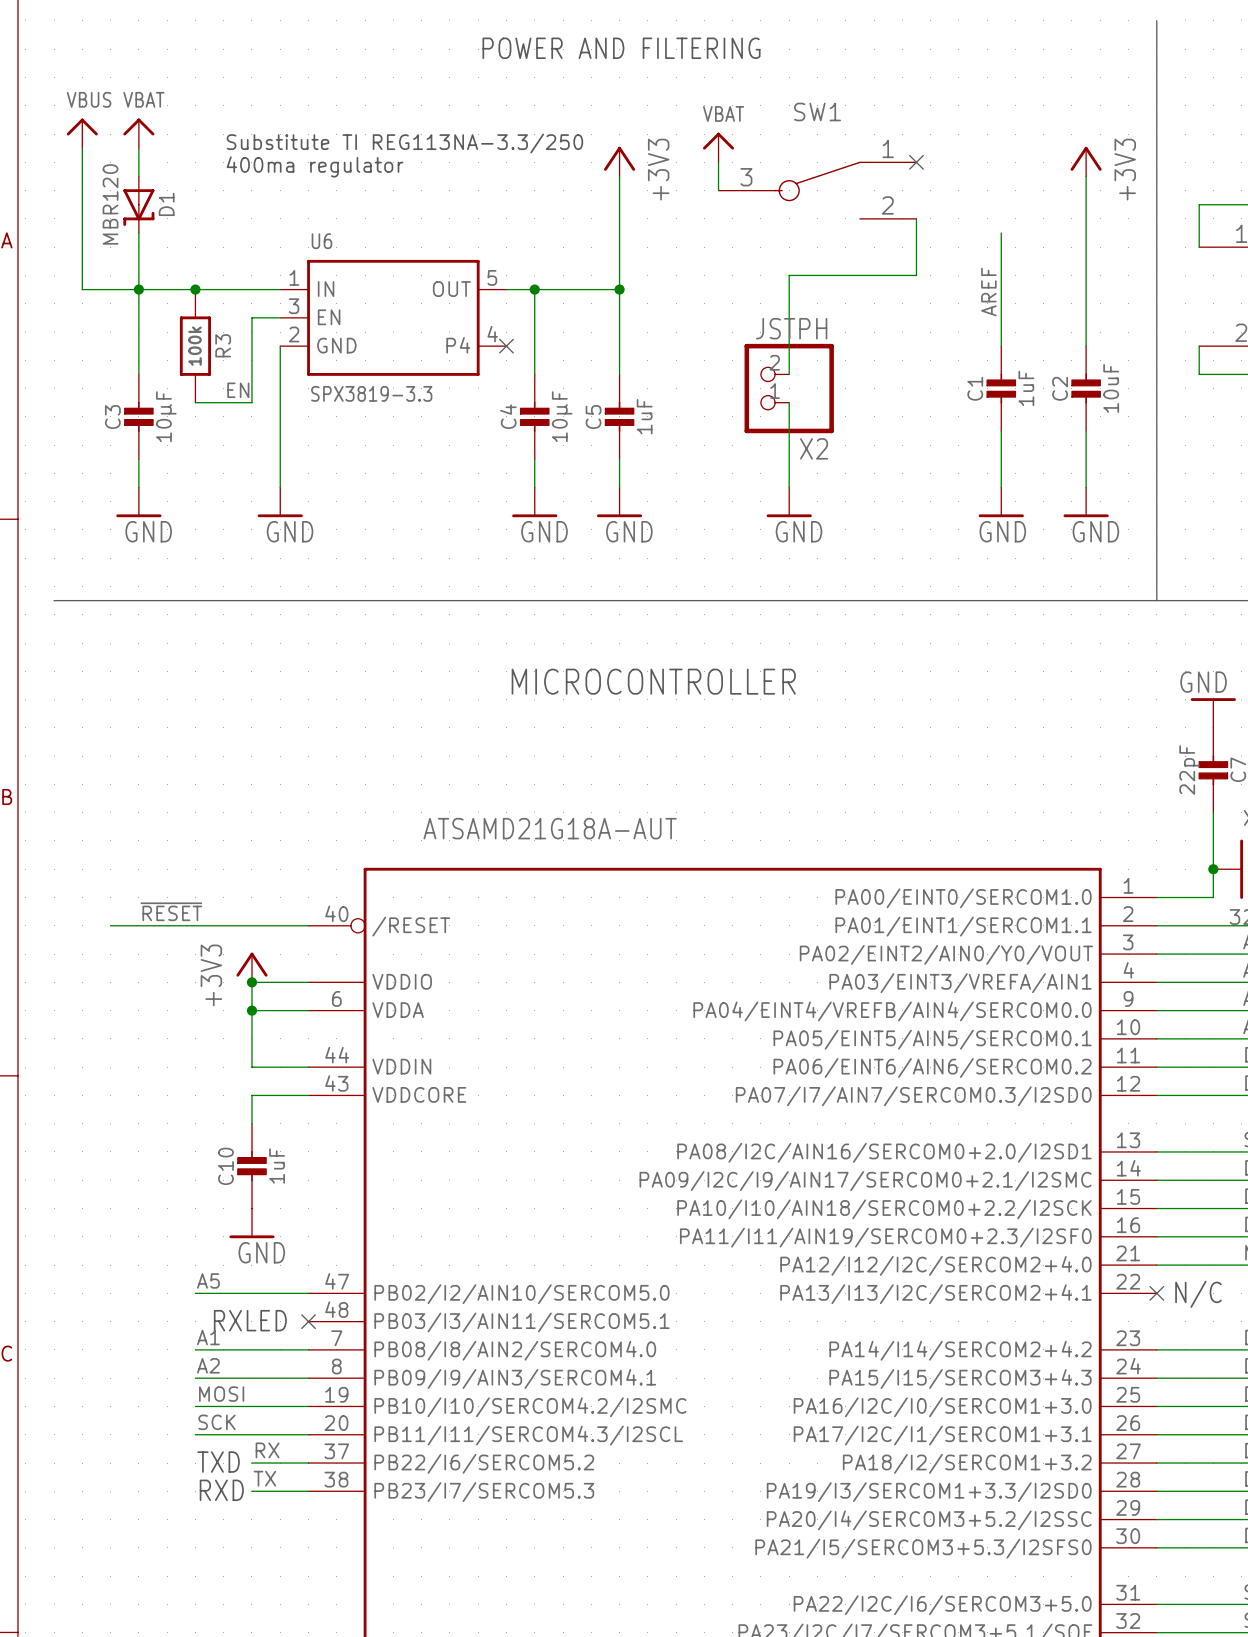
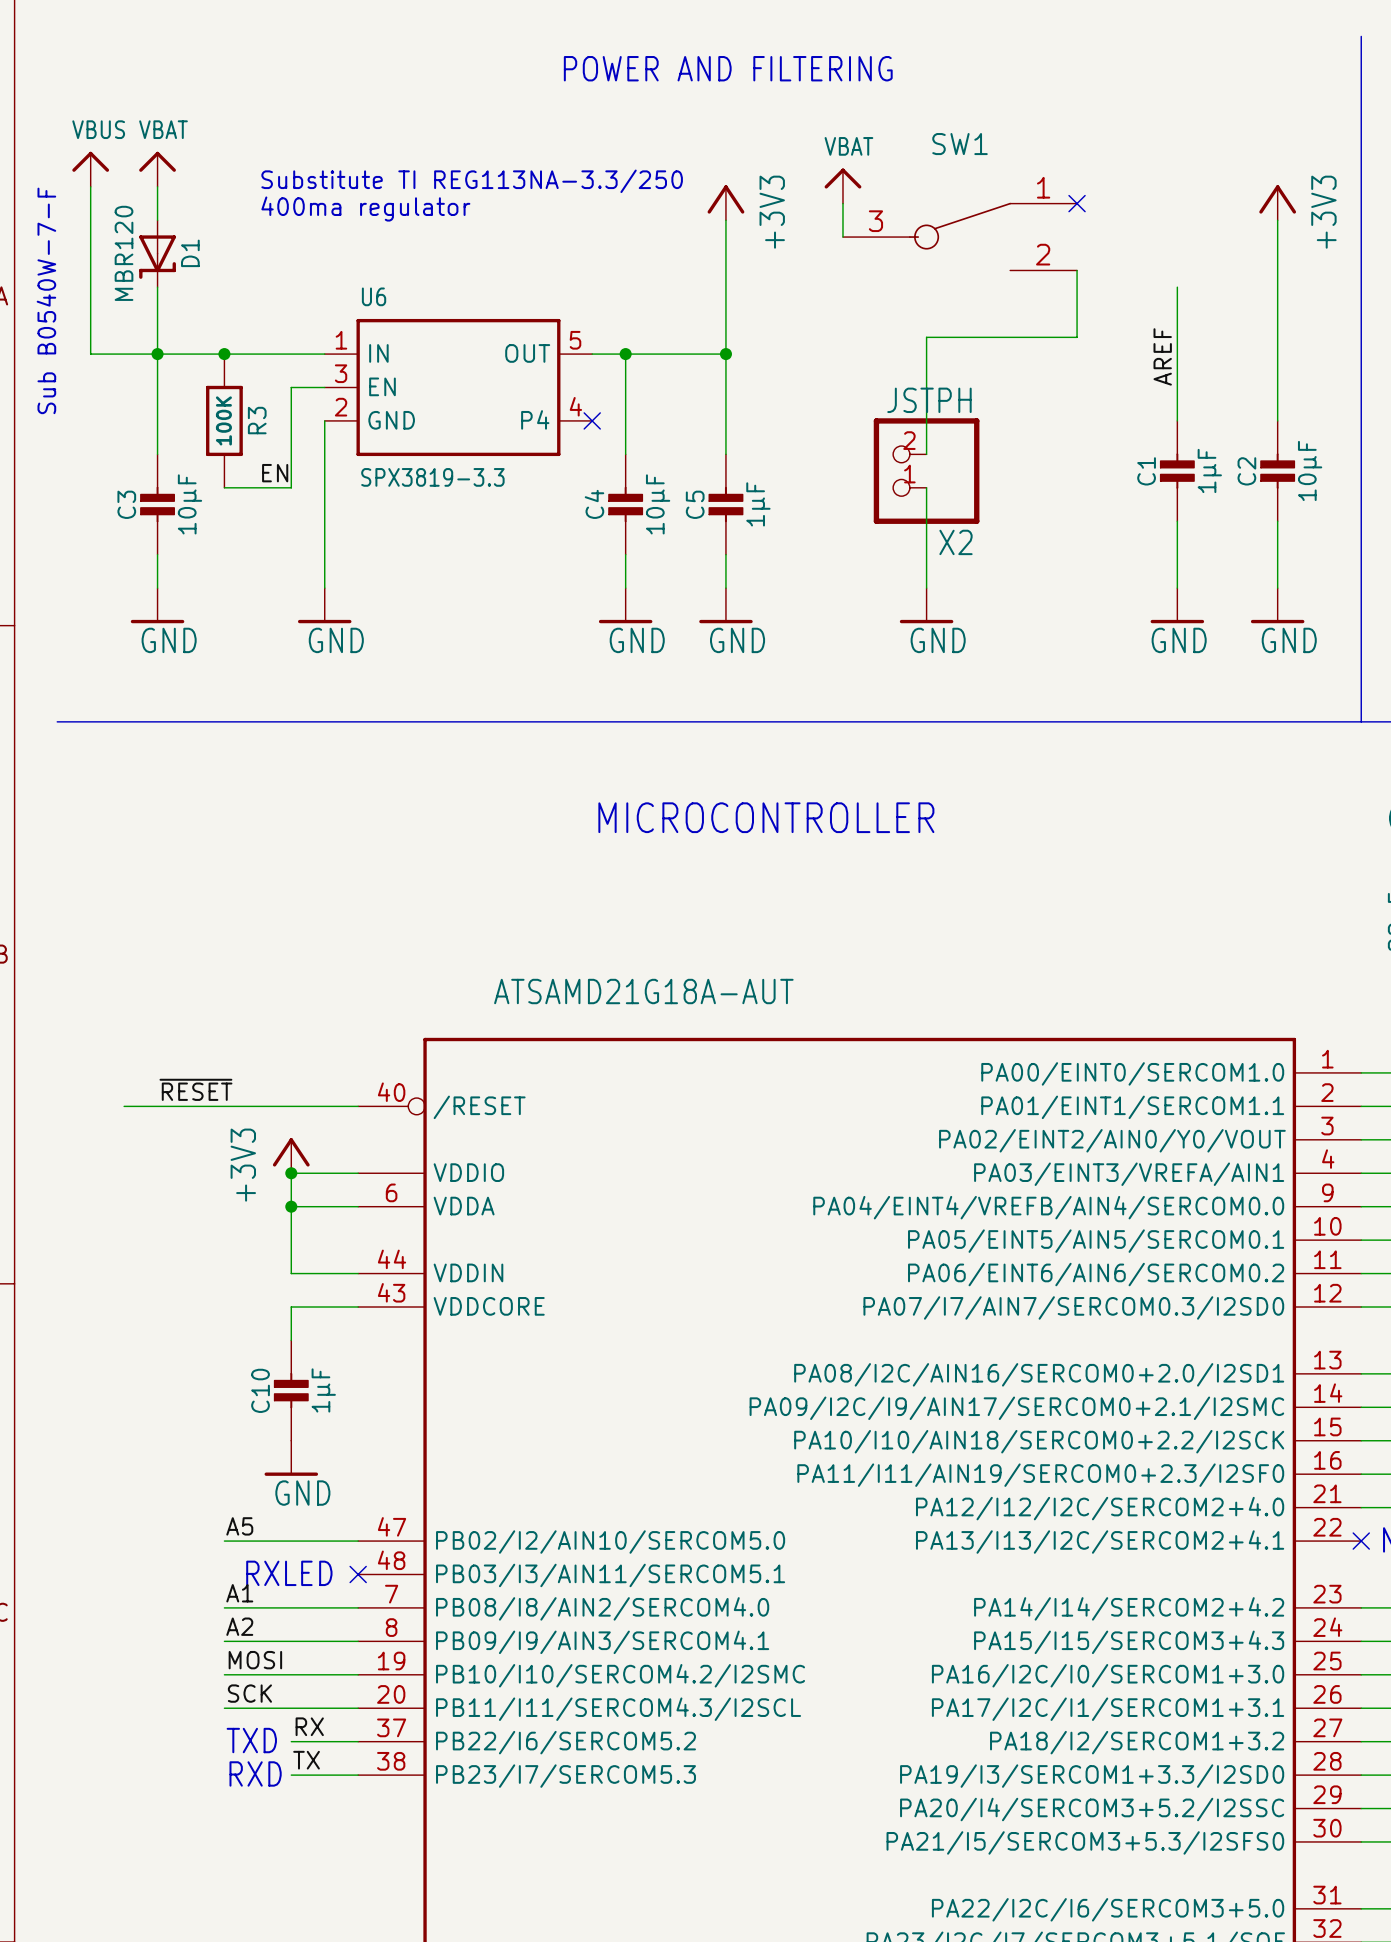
text: none -> Sub B0540W-7-F (46, 300)
R3 value: 100k (195, 346) -> 100K (223, 420)
C1 value: 1uF (1026, 388) -> 1µF (1209, 470)
C2 value: 10uF (1111, 388) -> 10µF (1310, 470)
C5 value: 1uF (644, 416) -> 1µF (758, 504)
C10 value: 1uF (277, 1166) -> 1µF (323, 1390)

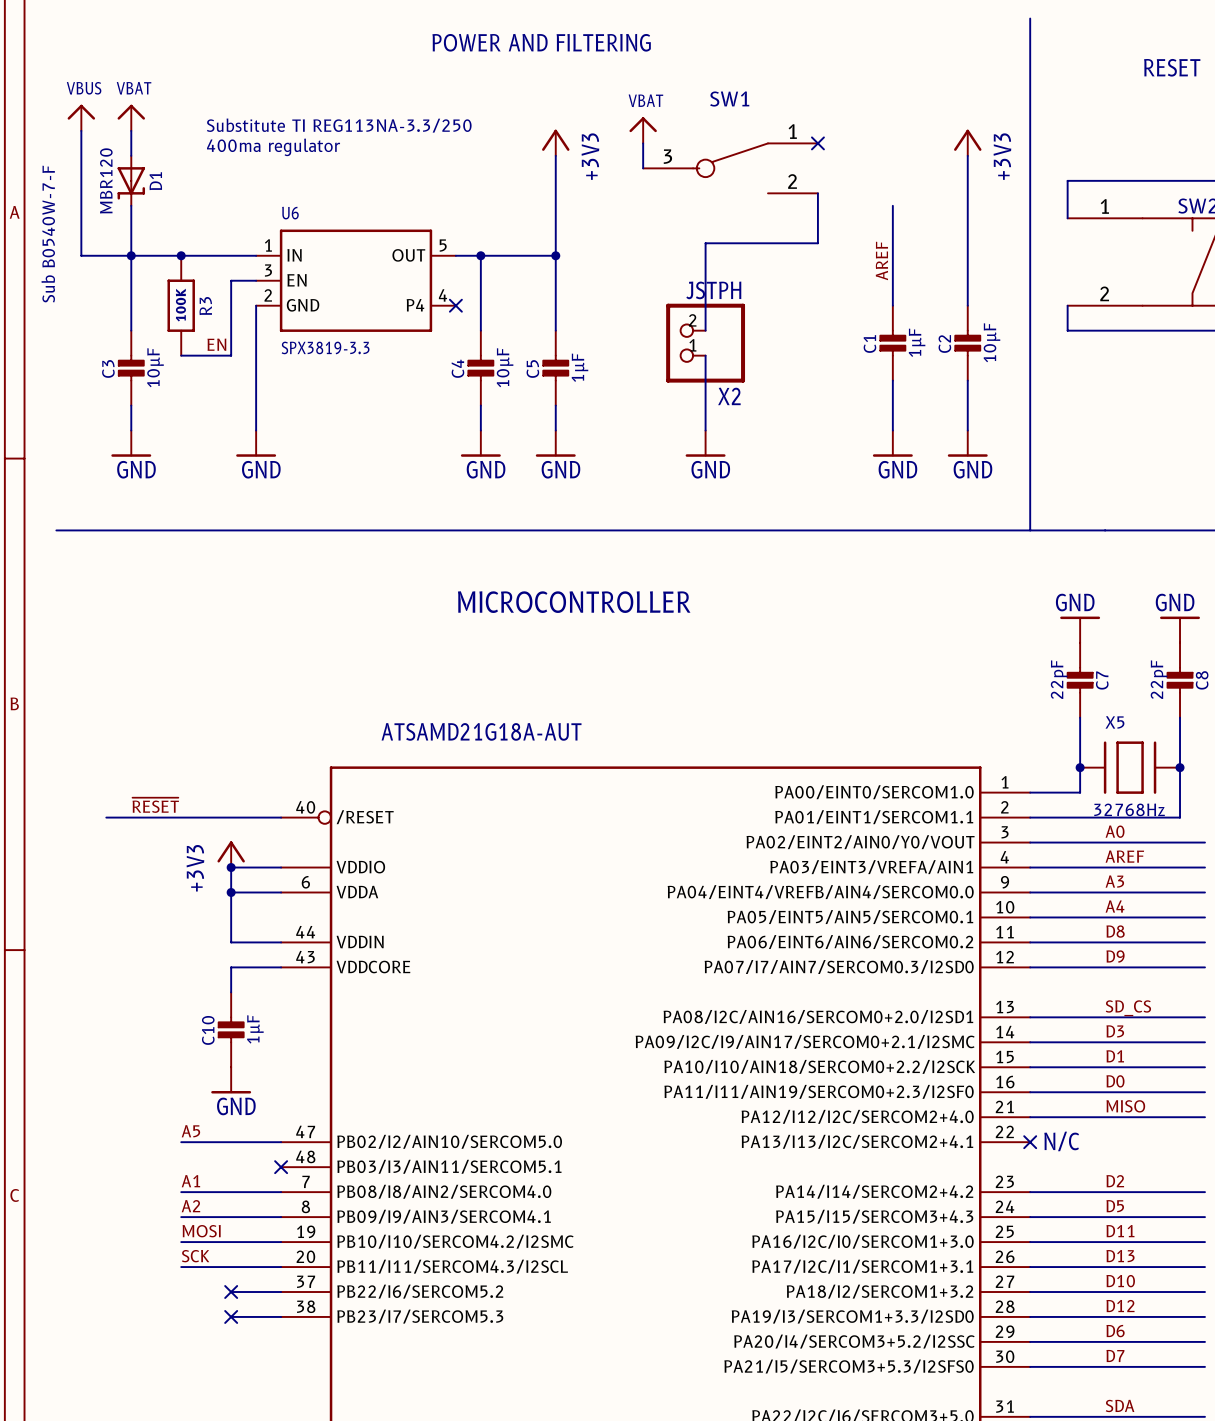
text: RXLED (289, 1573) -> none
label: RX (309, 1726) -> none
text: TXD (251, 1740) -> none
no-connect mark: none -> (231, 1292)
label: TX (306, 1760) -> none
text: RXD (255, 1773) -> none
no-connect mark: none -> (231, 1316)

